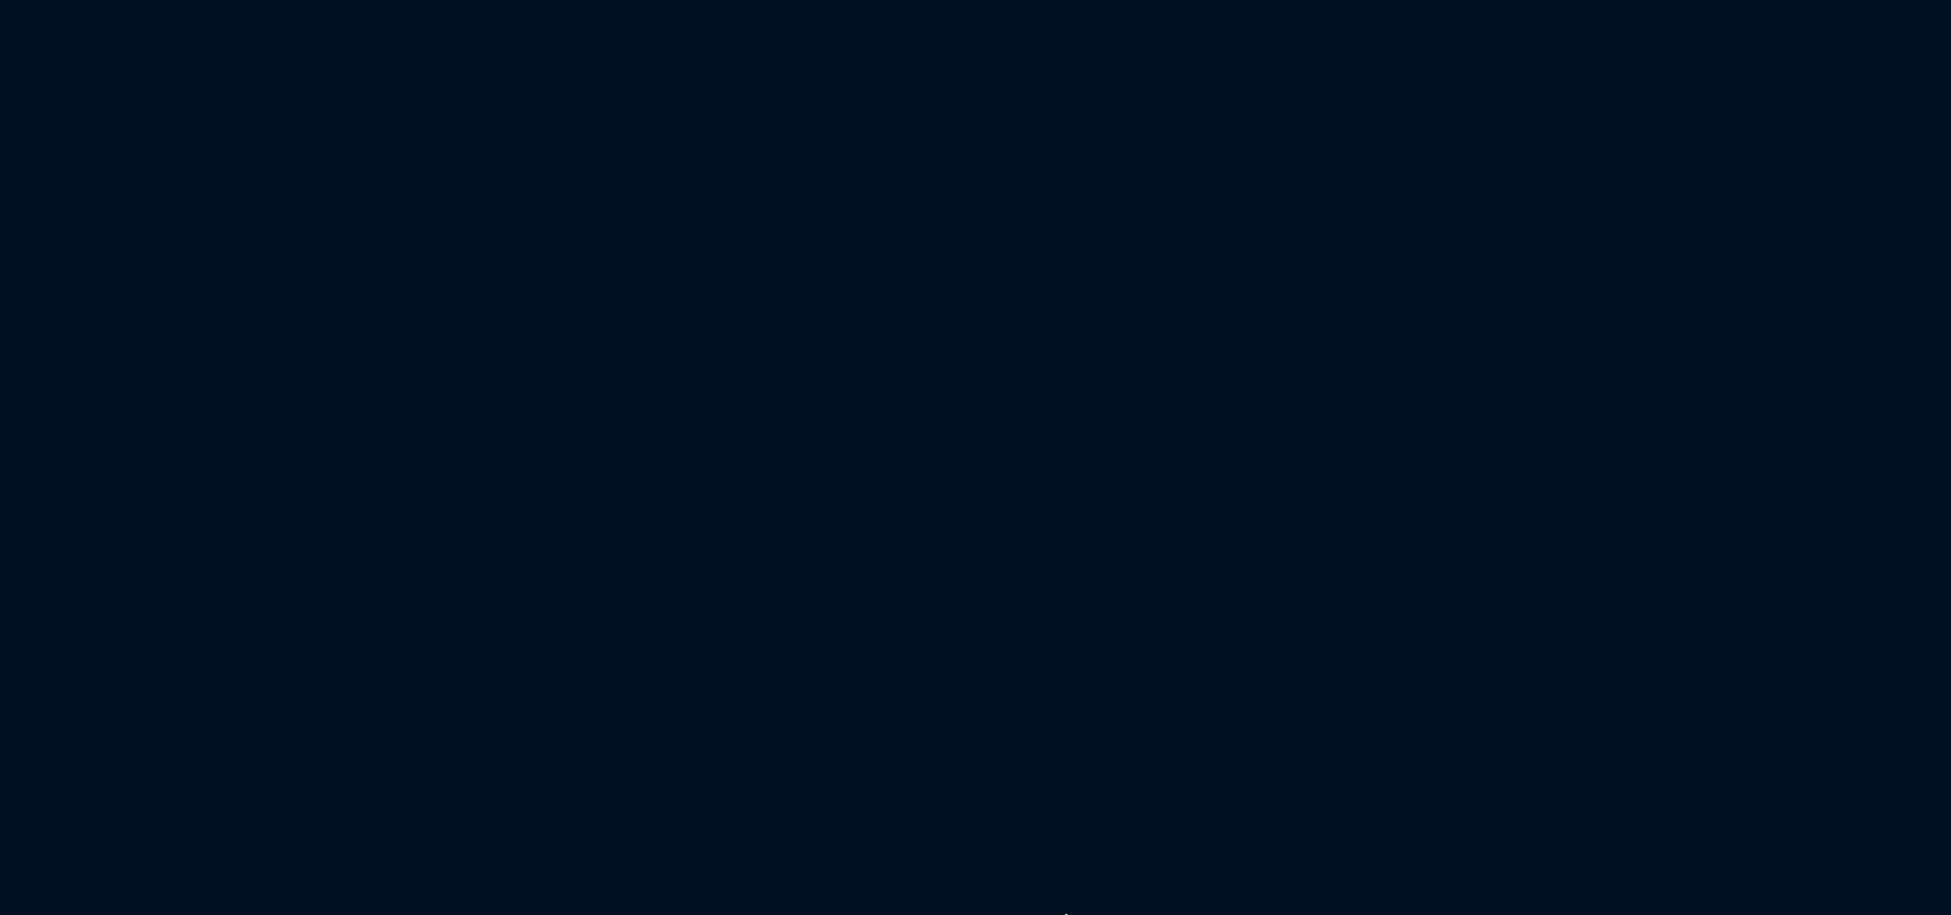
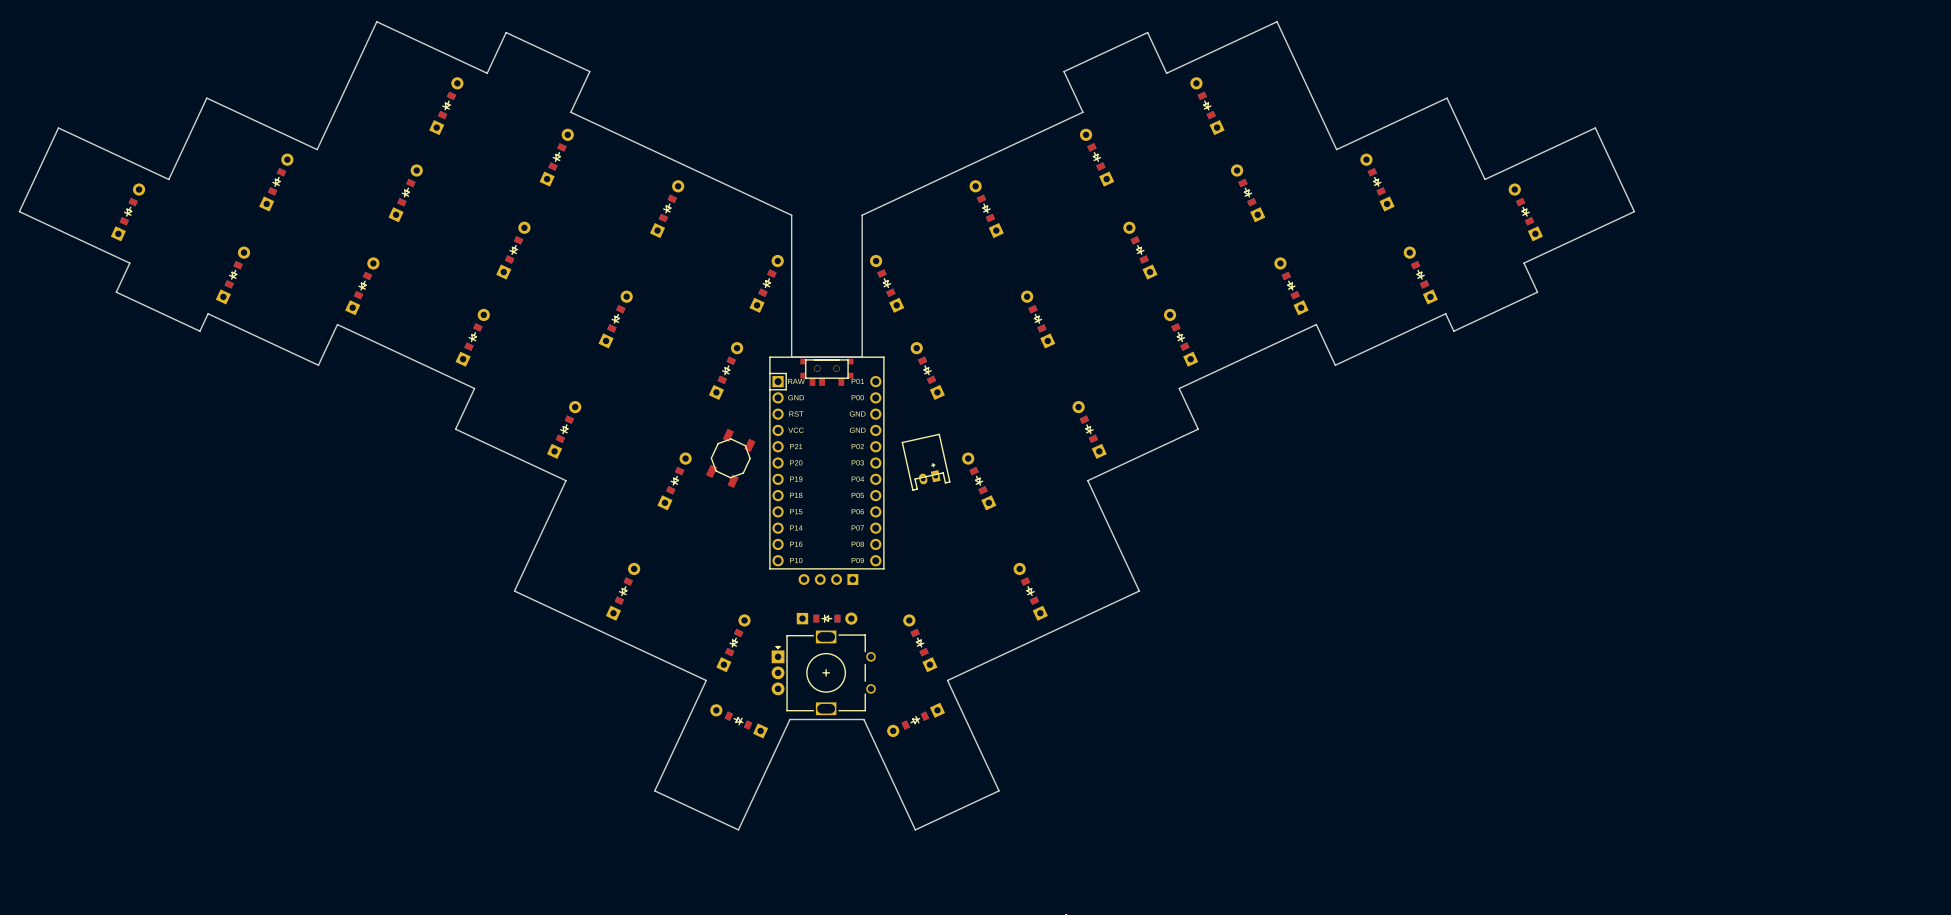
board edge: none -> (376, 21) (317, 149) (206, 98) (168, 179) (58, 127) (19, 211) (129, 263) (116, 292) (199, 331) (208, 313) (318, 365) (337, 324) (474, 388) (455, 429) (566, 480) (514, 591) (706, 680) (654, 790) (738, 829) (789, 719) (863, 719) (915, 829) (999, 790) (947, 680) (1139, 591) (1087, 480) (1198, 429) (1179, 388) (1316, 324) (1335, 365) (1445, 313) (1453, 331) (1537, 292) (1523, 263) (1634, 211) (1595, 127) (1484, 179) (1447, 98) (1336, 149) (1277, 21) (1166, 73) (1147, 32) (1063, 71) (1082, 112) (862, 215) (862, 357) (791, 357) (791, 215) (570, 112) (589, 71) (506, 32) (487, 73) (376, 21)
part: none -> (446, 106)
part: none -> (1207, 106)
part: none -> (556, 157)
part: none -> (1097, 157)
part: none -> (276, 182)
part: none -> (1377, 182)
part: none -> (405, 193)
part: none -> (1248, 193)
part: none -> (667, 209)
part: none -> (986, 209)
part: none -> (127, 212)
part: none -> (1525, 212)
part: none -> (513, 250)
part: none -> (1140, 250)
part: none -> (232, 275)
part: none -> (1420, 275)
part: none -> (766, 283)
part: none -> (887, 283)
part: none -> (362, 286)
part: none -> (1291, 286)
part: none -> (615, 319)
part: none -> (1038, 319)
part: none -> (472, 337)
part: none -> (1181, 337)
part: none -> (726, 371)
part: none -> (927, 371)
part: none -> (826, 372)
part: none -> (564, 429)
part: none -> (1089, 429)
part: none -> (730, 458)
part: none -> (926, 462)
part: none -> (826, 463)
part: none -> (674, 481)
part: none -> (979, 481)
part: none -> (828, 579)
part: none -> (623, 591)
part: none -> (1030, 591)
part: none -> (827, 618)
part: none -> (733, 643)
part: none -> (920, 643)
part: none -> (823, 672)
part: none -> (916, 719)
part: none -> (739, 721)

